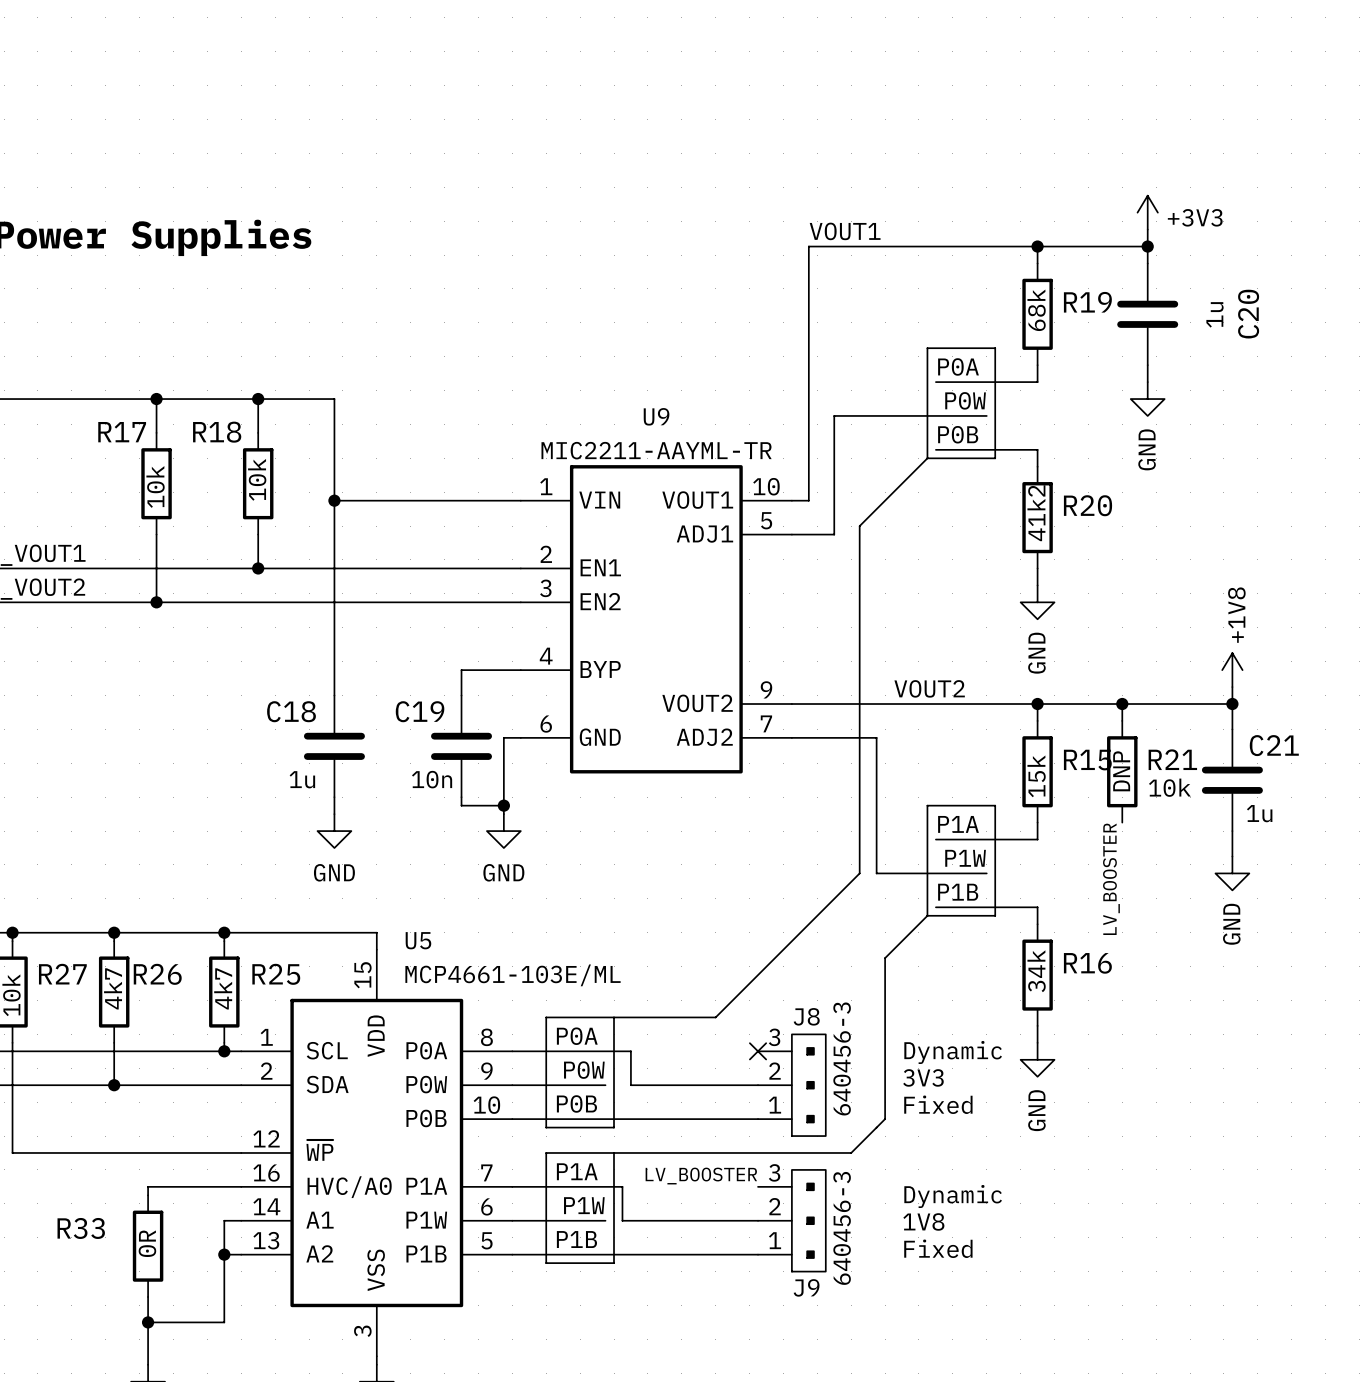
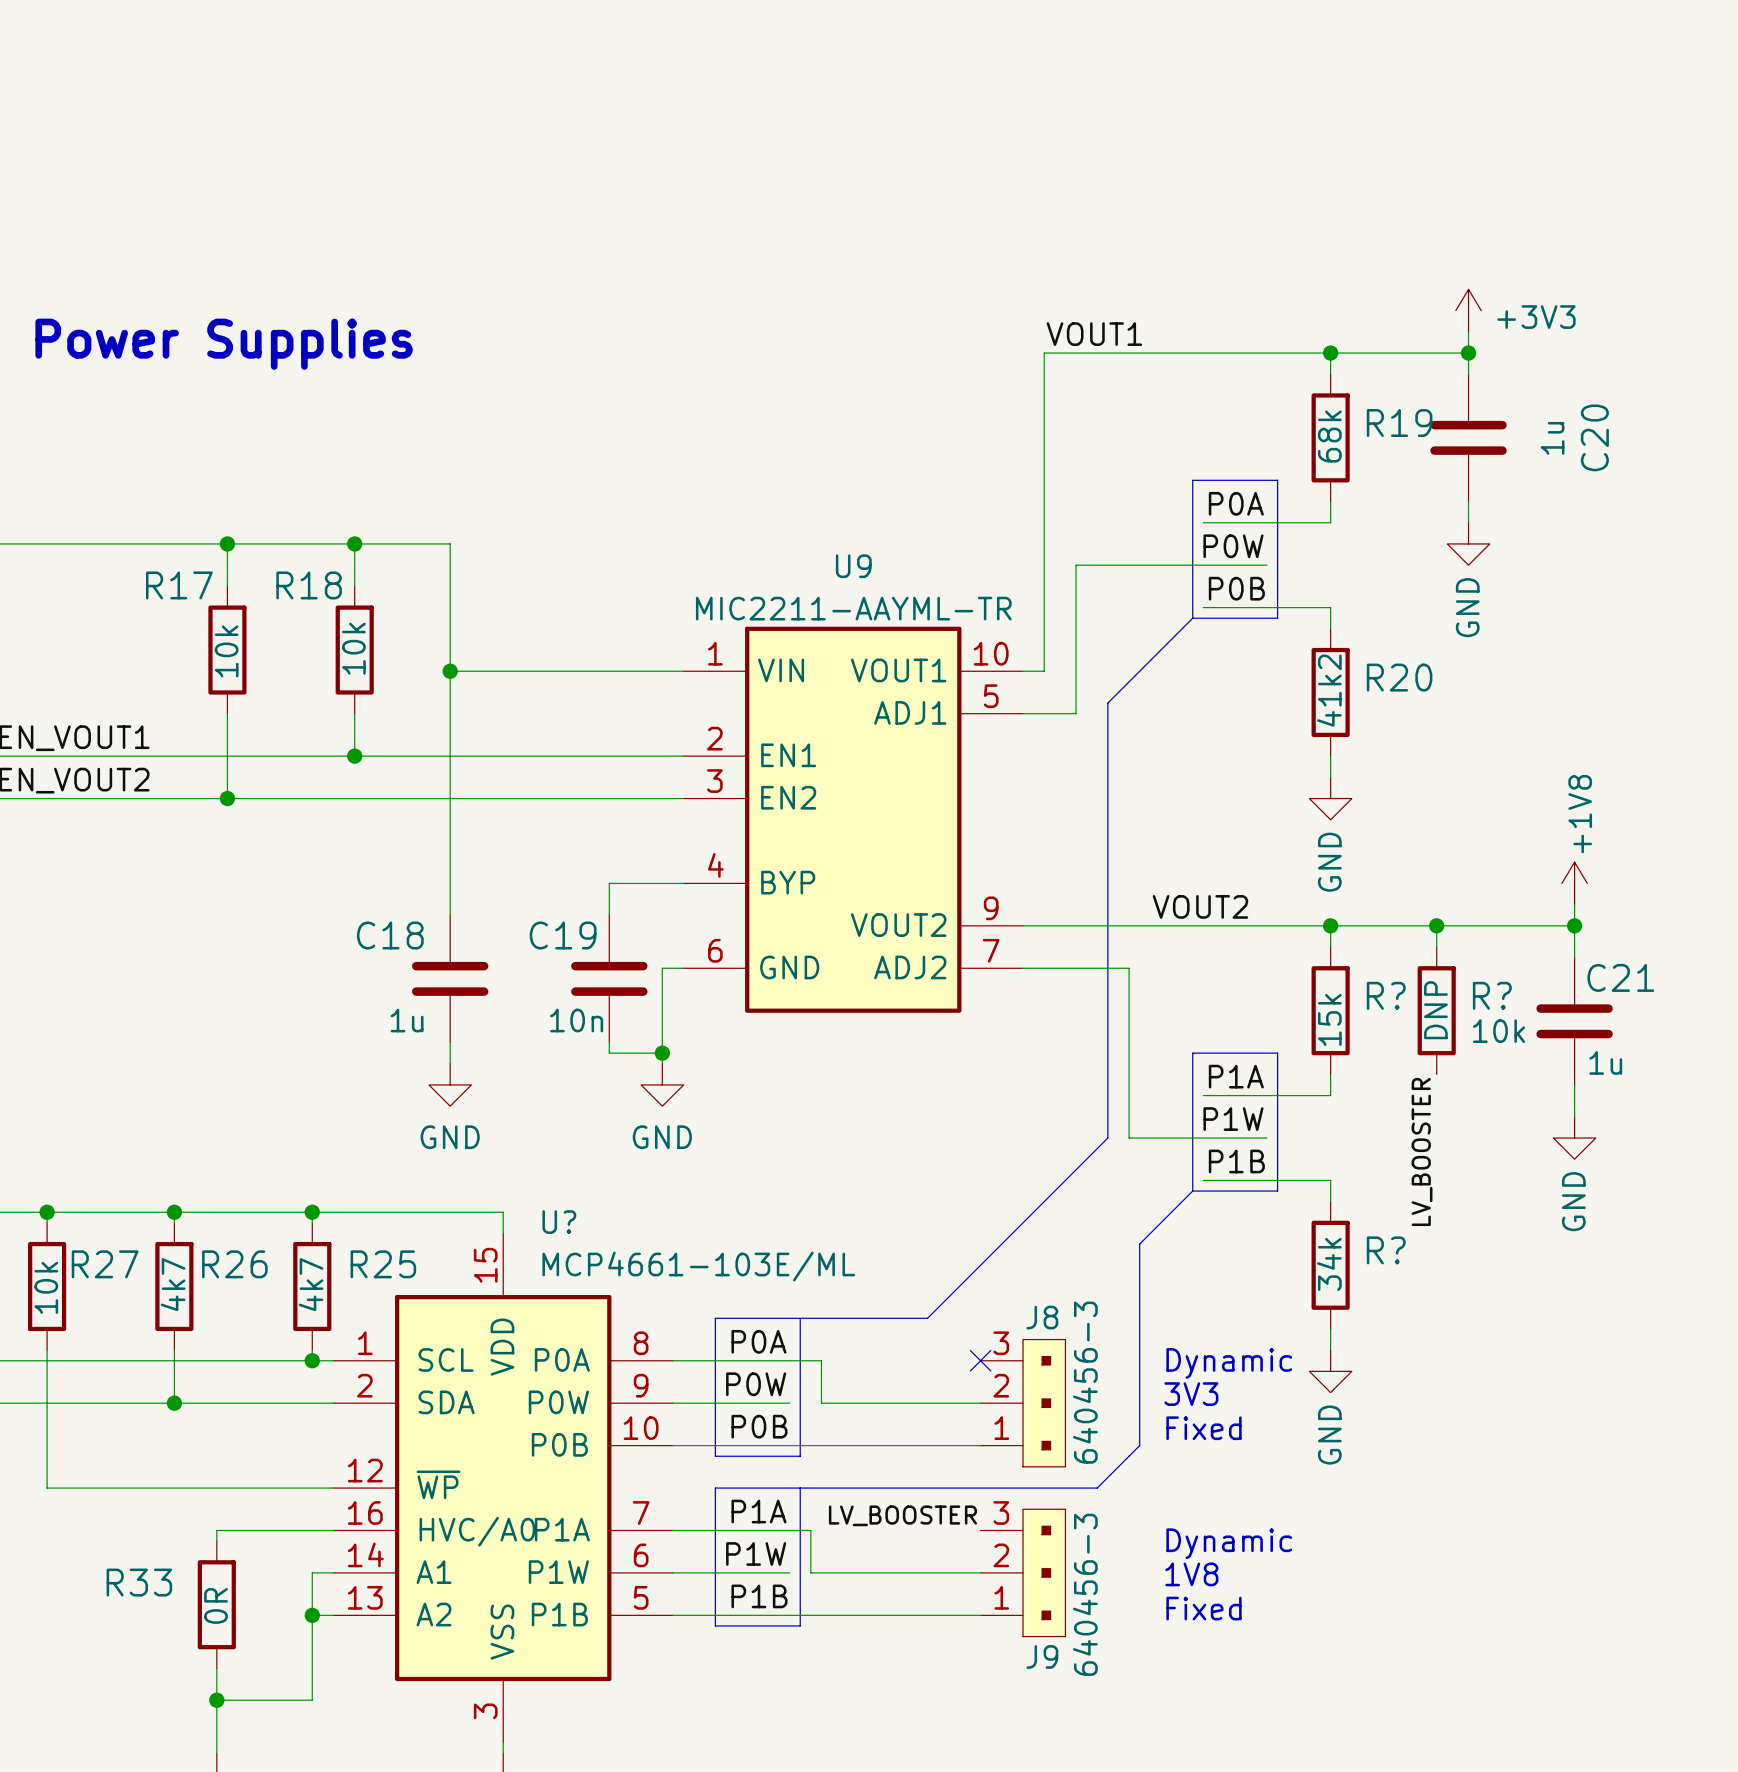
R21 name: R21 (1172, 759) -> R? (1492, 995)
R15 name: R15 (1087, 760) -> R? (1386, 995)
U5 name: U5 (418, 940) -> U? (559, 1222)
R16 name: R16 (1087, 963) -> R? (1386, 1250)

